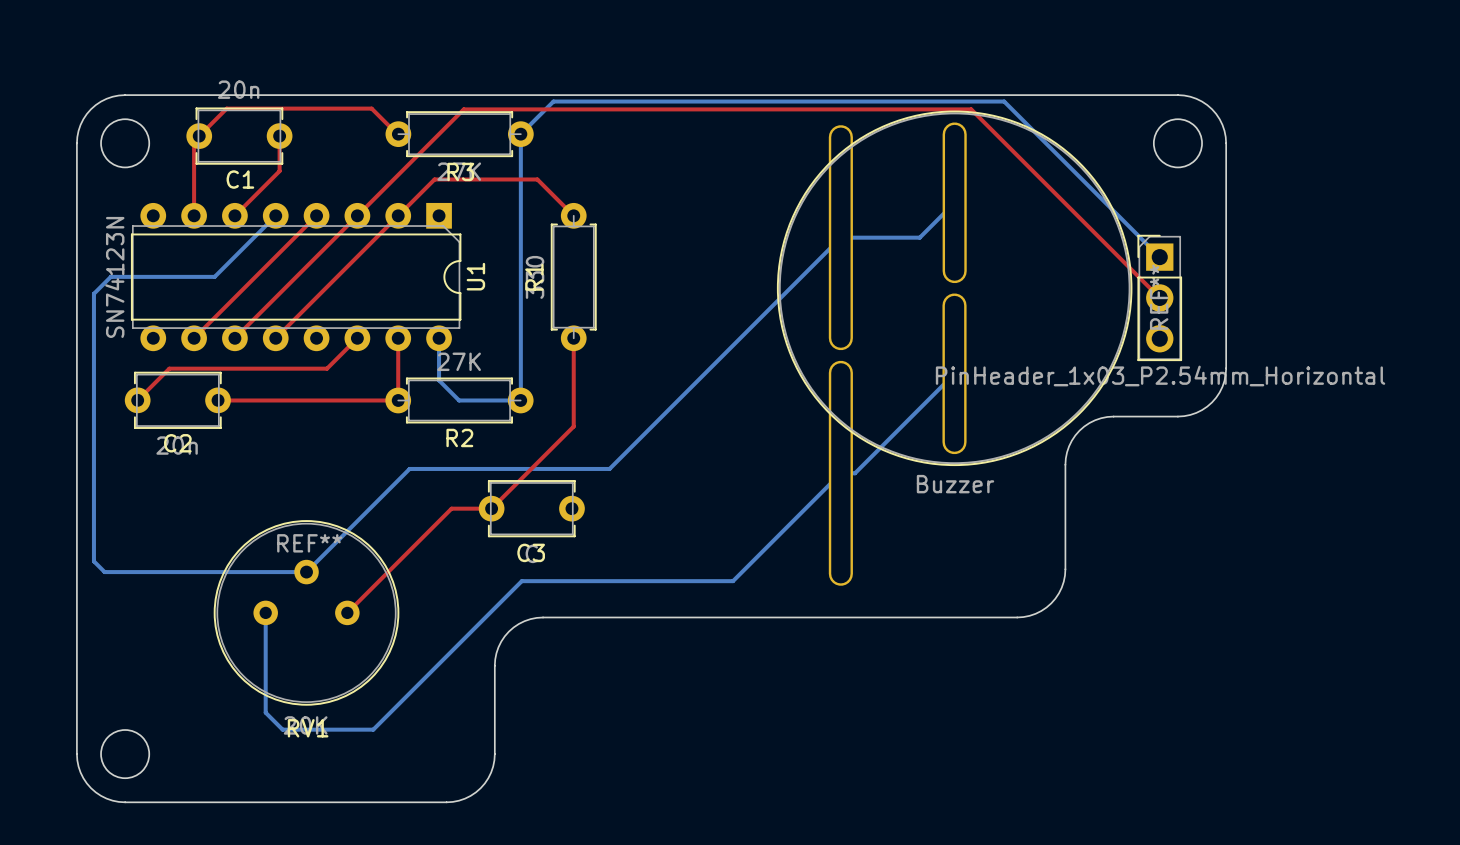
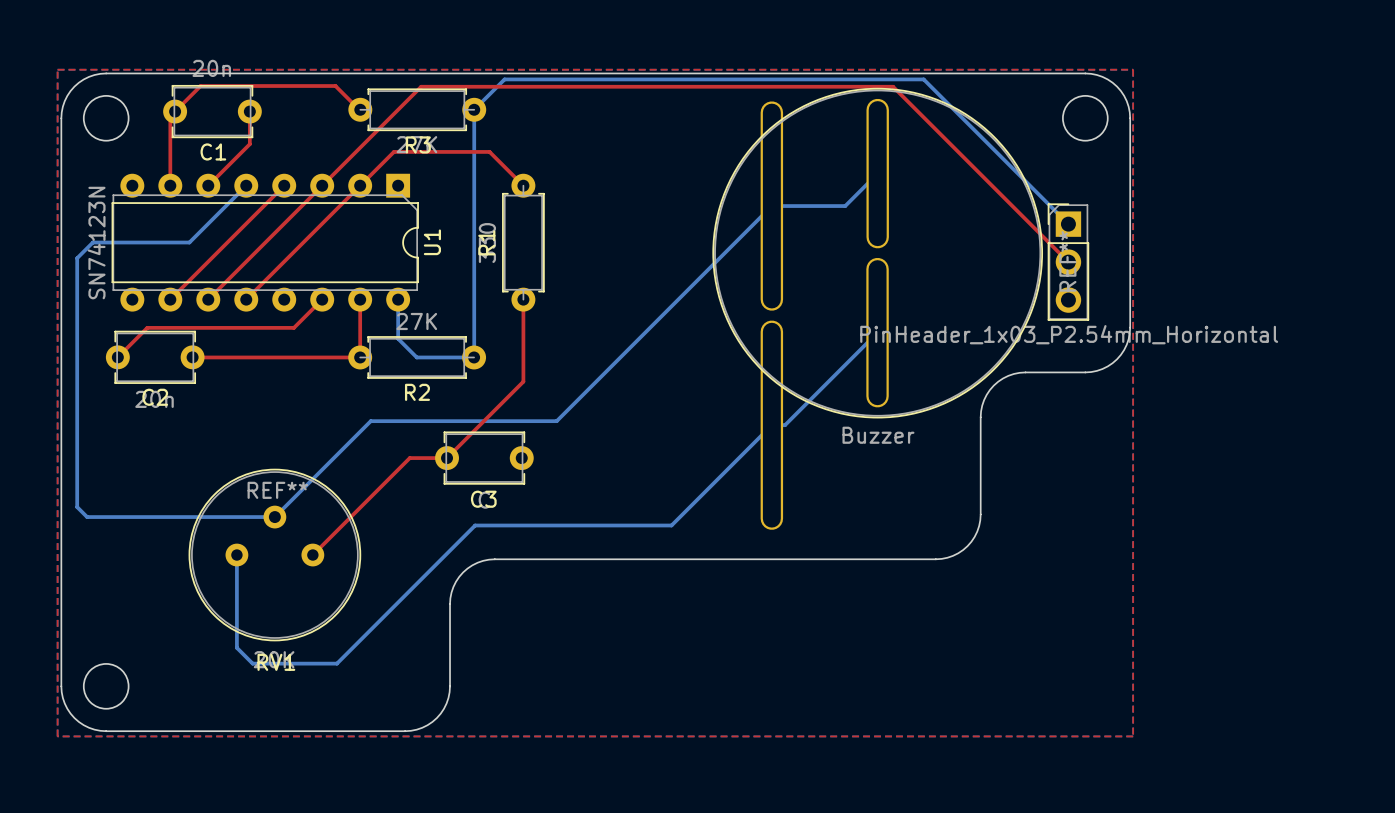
top zone outline: none -> (57, 69) (57, 736) (1133, 736) (1133, 69) (57, 69)

